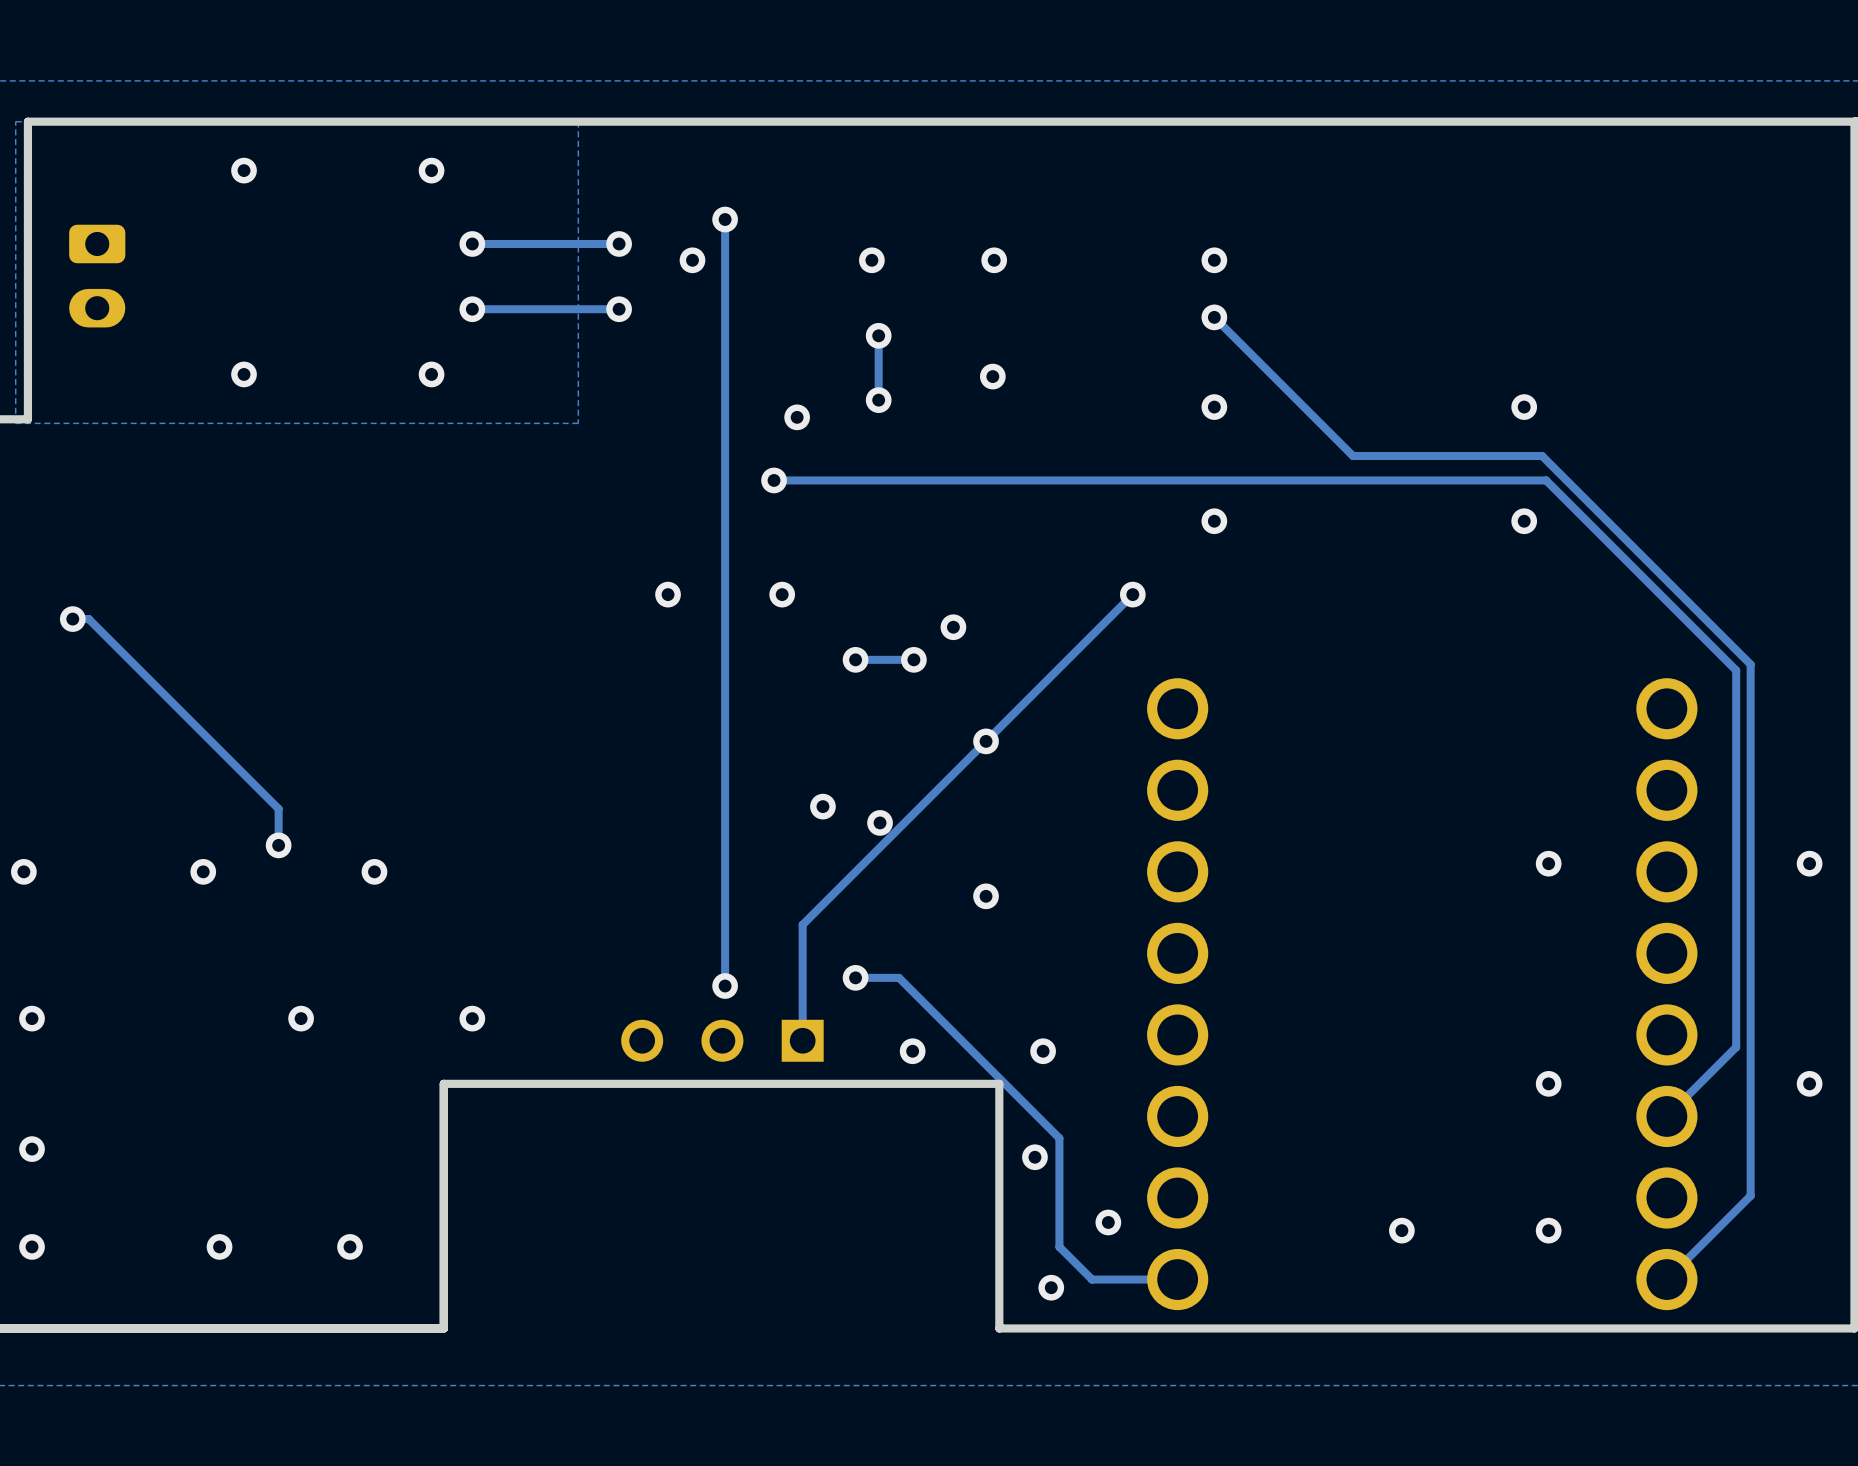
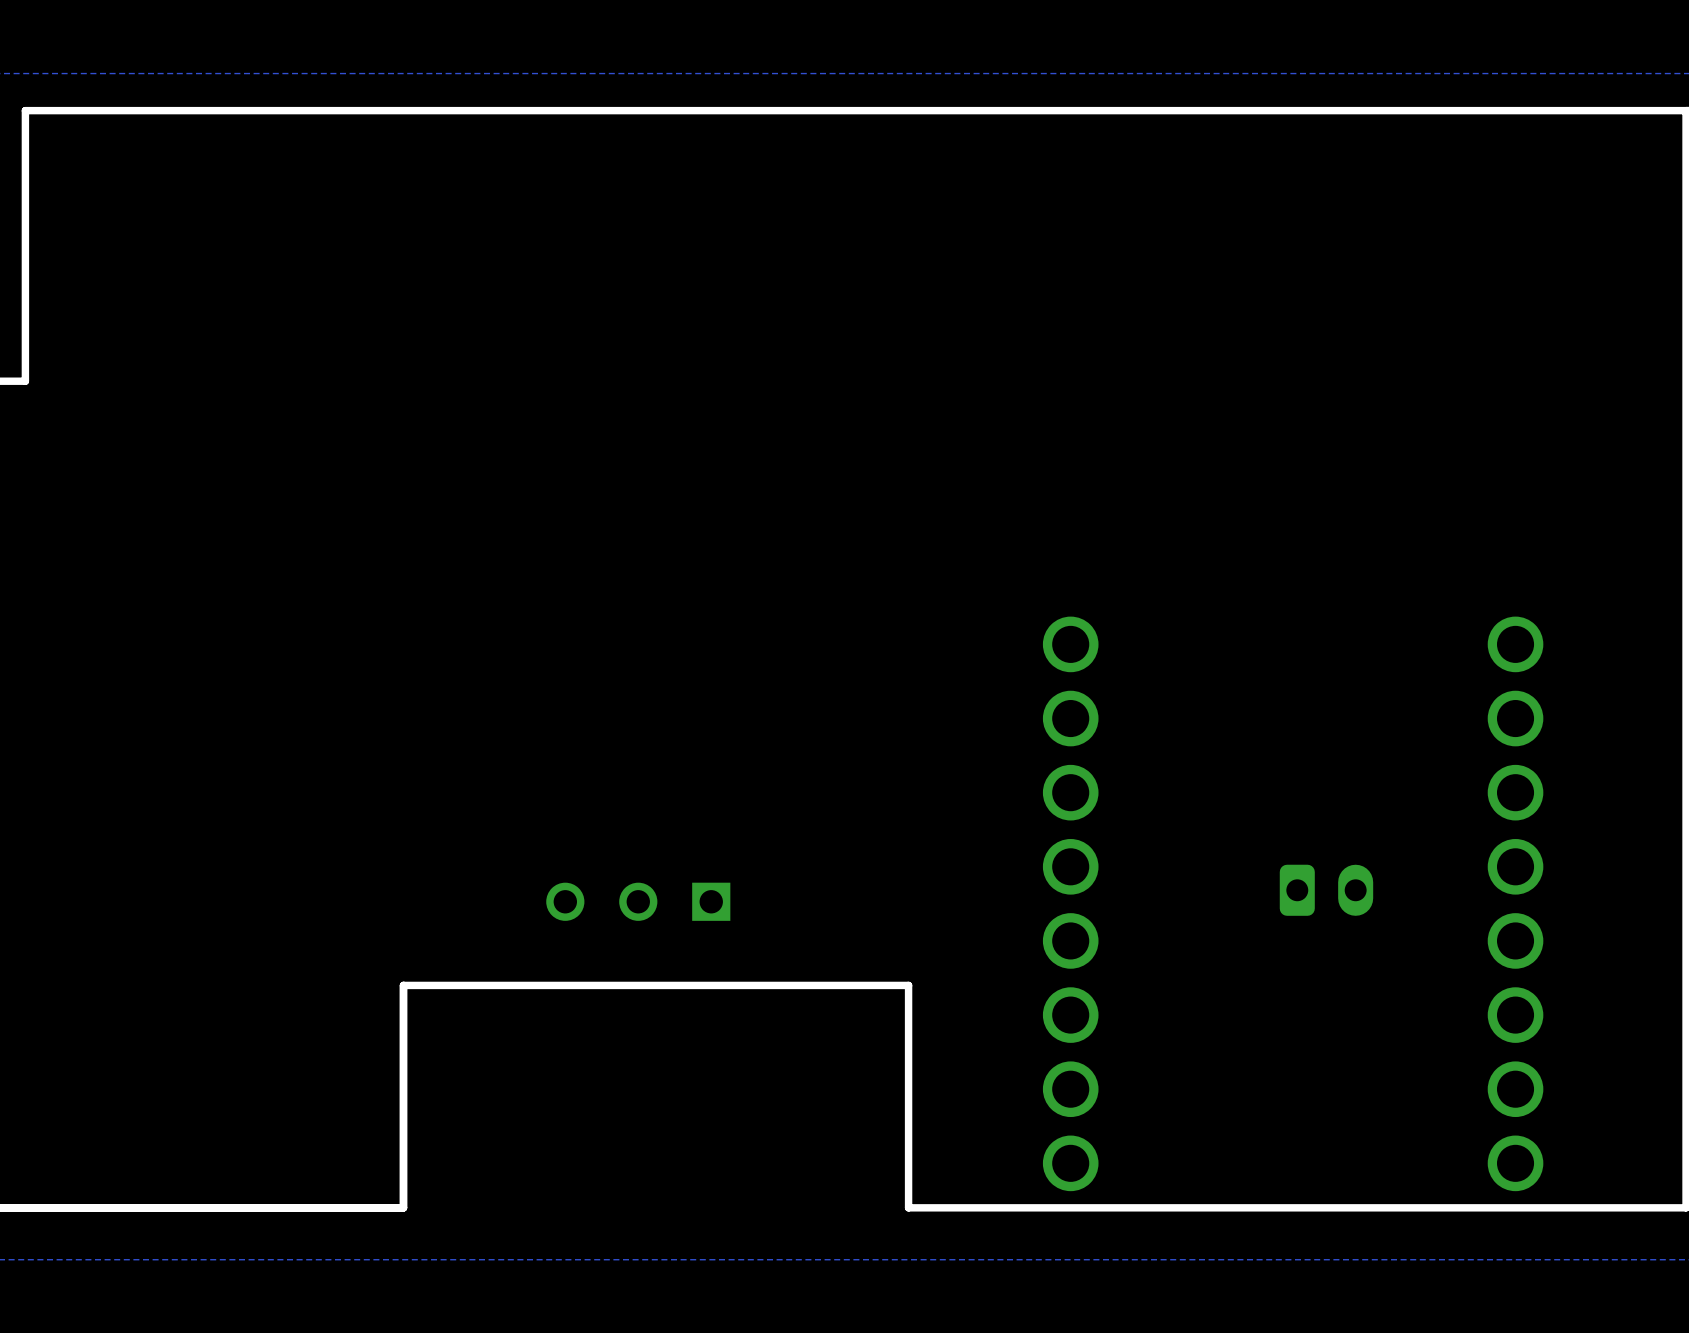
zone outline: (578, 121) (578, 423) (15, 423) (15, 121) (578, 121) -> none
via: (244, 170) -> none
via: (431, 170) -> none
track: (725, 219) (725, 986) -> none
via: (725, 219) -> none
via: (472, 243) -> none
track: (619, 243) (472, 243) -> none
via: (619, 243) -> none
via: (692, 260) -> none
via: (871, 260) -> none
via: (994, 260) -> none
via: (1214, 260) -> none
part: (97, 276) -> none
via: (472, 309) -> none
track: (619, 309) (472, 309) -> none
via: (619, 309) -> none
track: (1214, 317) (1352, 455) (1542, 455) (1750, 664) (1750, 1195) (1666, 1279) -> none
via: (1214, 317) -> none
track: (878, 335) (878, 400) -> none
via: (878, 335) -> none
via: (244, 374) -> none
via: (431, 374) -> none
via: (992, 376) -> none
via: (878, 400) -> none
via: (1214, 407) -> none
via: (1524, 407) -> none
via: (797, 417) -> none
track: (774, 480) (1546, 480) (1736, 670) (1736, 1047) (1666, 1116) -> none
via: (774, 480) -> none
via: (1214, 521) -> none
via: (1524, 521) -> none
via: (668, 594) -> none
via: (782, 594) -> none
track: (1132, 594) (802, 924) (802, 1040) -> none
via: (1132, 594) -> none
track: (72, 619) (88, 619) (278, 808) (278, 845) -> none
via: (72, 619) -> none
via: (953, 627) -> none
via: (855, 659) -> none
track: (913, 659) (855, 659) -> none
via: (913, 659) -> none
via: (986, 741) -> none
via: (822, 806) -> none
via: (880, 822) -> none
via: (278, 845) -> none
via: (1548, 863) -> none
via: (1809, 863) -> none
via: (23, 871) -> none
via: (203, 871) -> none
via: (374, 871) -> none
via: (986, 896) -> none
track: (855, 977) (899, 977) (1059, 1138) (1059, 1246) (1092, 1279) (1177, 1279) -> none
via: (855, 977) -> none
part: none -> (1326, 890)
via: (725, 986) -> none
via: (32, 1018) -> none
via: (301, 1018) -> none
via: (472, 1018) -> none
part position: (722, 1040) -> (638, 901)
via: (912, 1051) -> none
via: (1043, 1051) -> none
via: (1548, 1083) -> none
via: (1809, 1083) -> none
via: (32, 1149) -> none
via: (1034, 1157) -> none
via: (1108, 1222) -> none
via: (1401, 1230) -> none
via: (1548, 1230) -> none
via: (32, 1246) -> none
via: (219, 1246) -> none
via: (350, 1246) -> none
via: (1051, 1287) -> none

